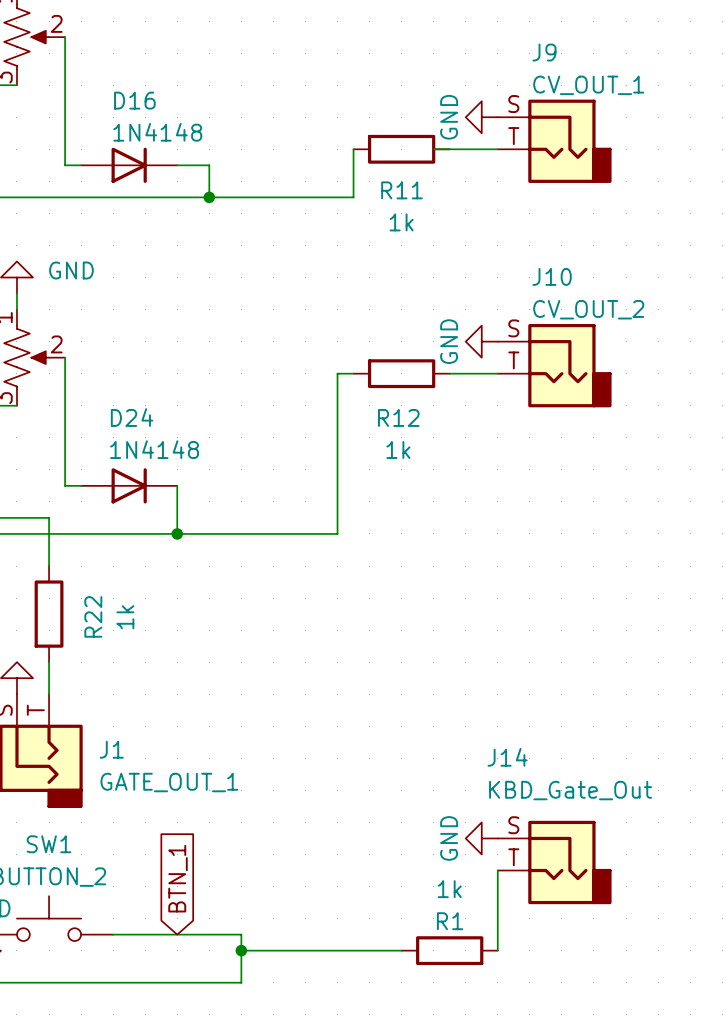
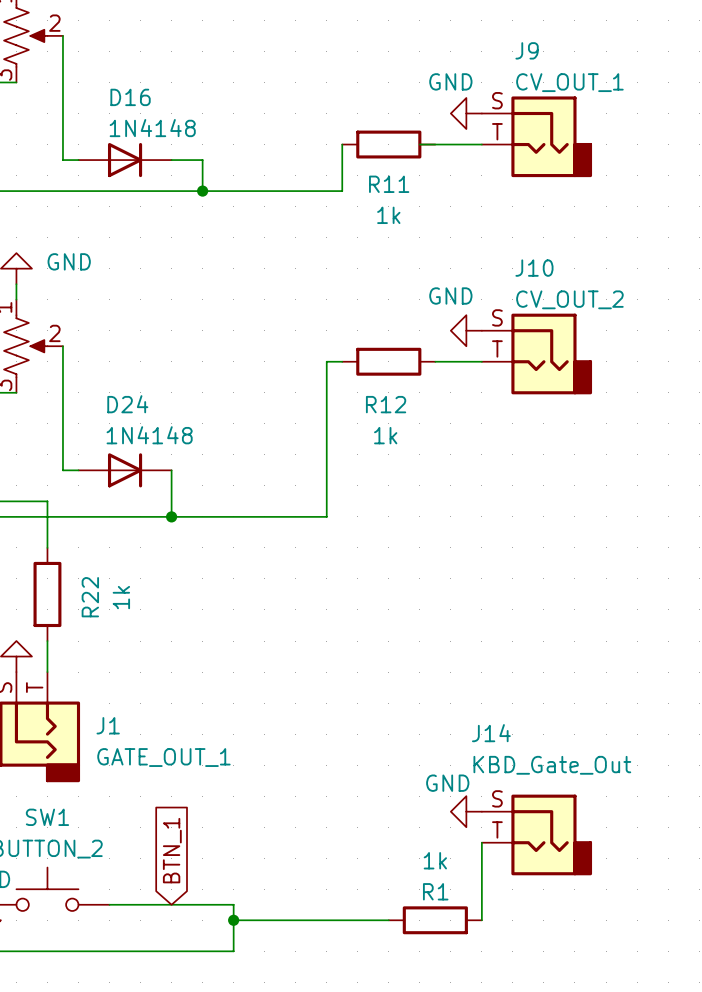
power symbol text rotation: 0° (449, 117) -> 90° clockwise (450, 81)
power symbol text rotation: 0° (449, 341) -> 90° clockwise (450, 296)
power symbol text rotation: 0° (449, 838) -> 90° clockwise (447, 783)

